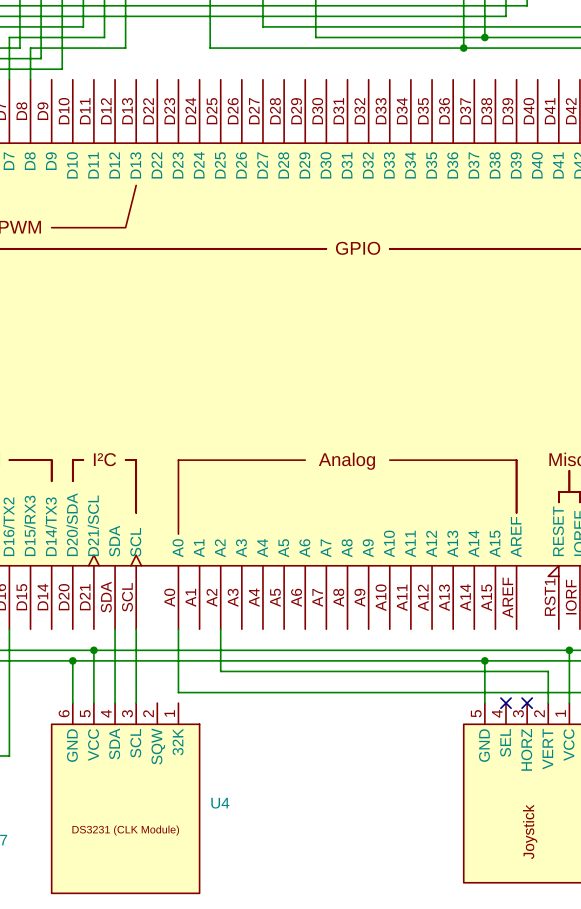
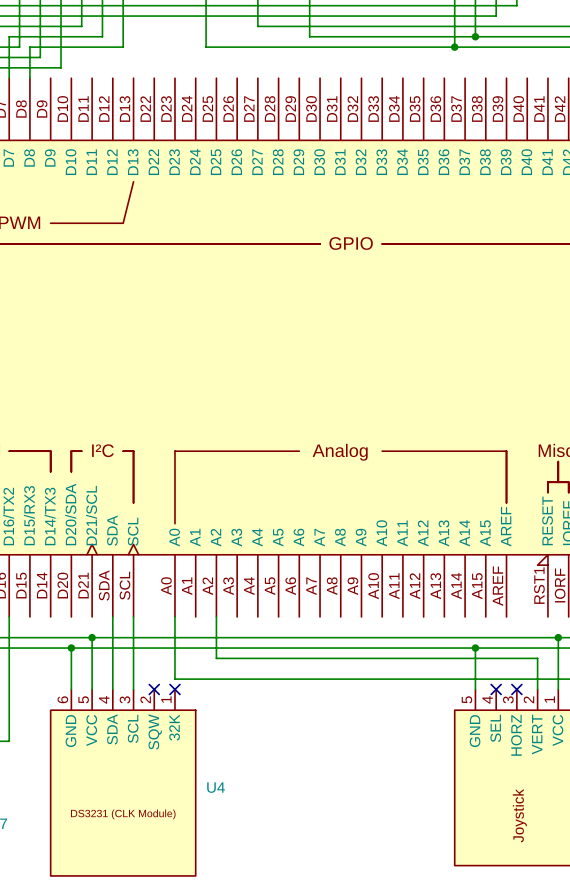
no-connect mark: none -> (154, 689)
no-connect mark: none -> (174, 689)

